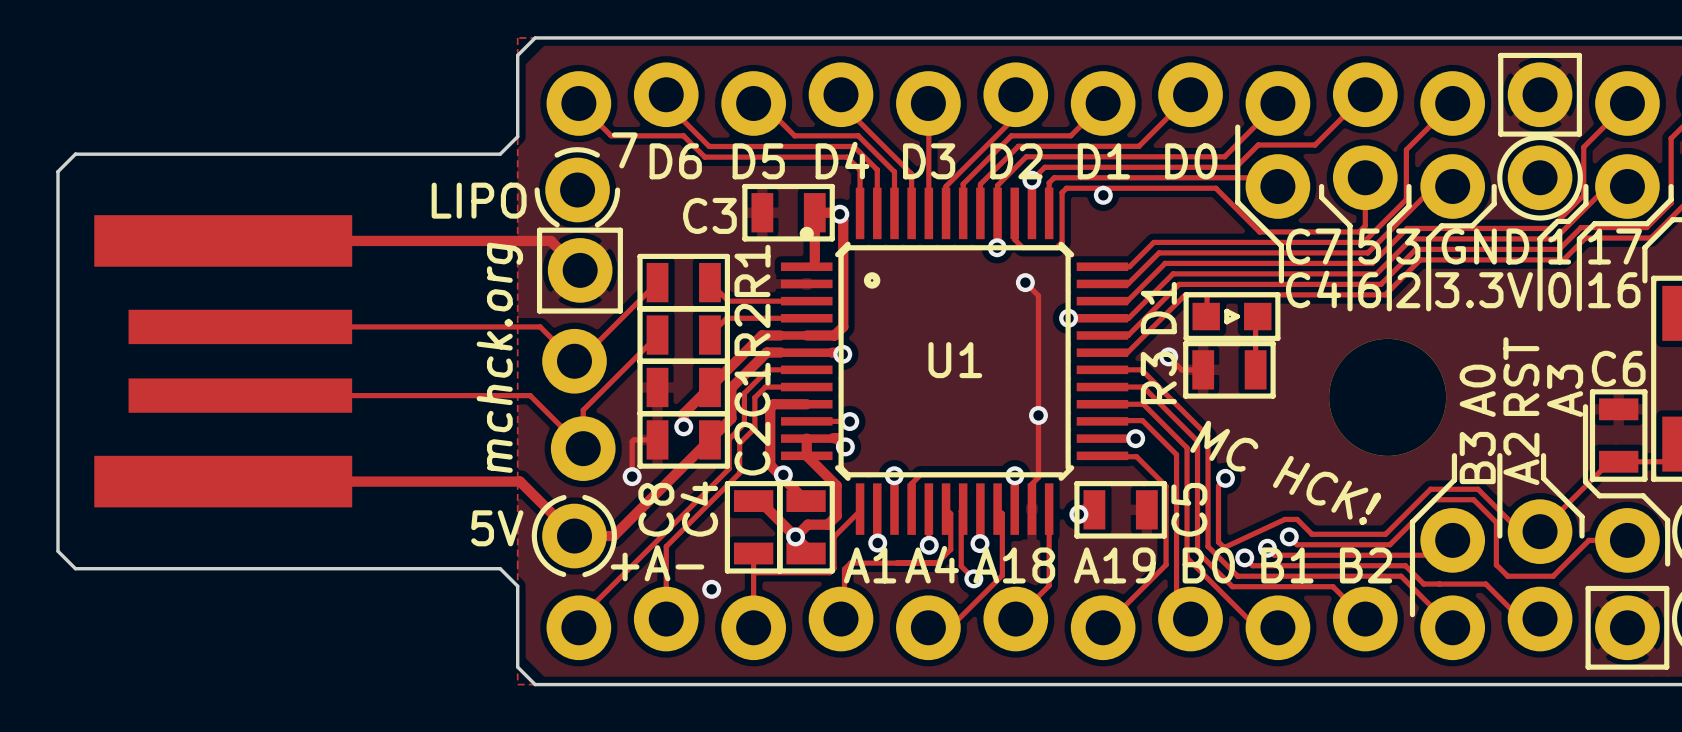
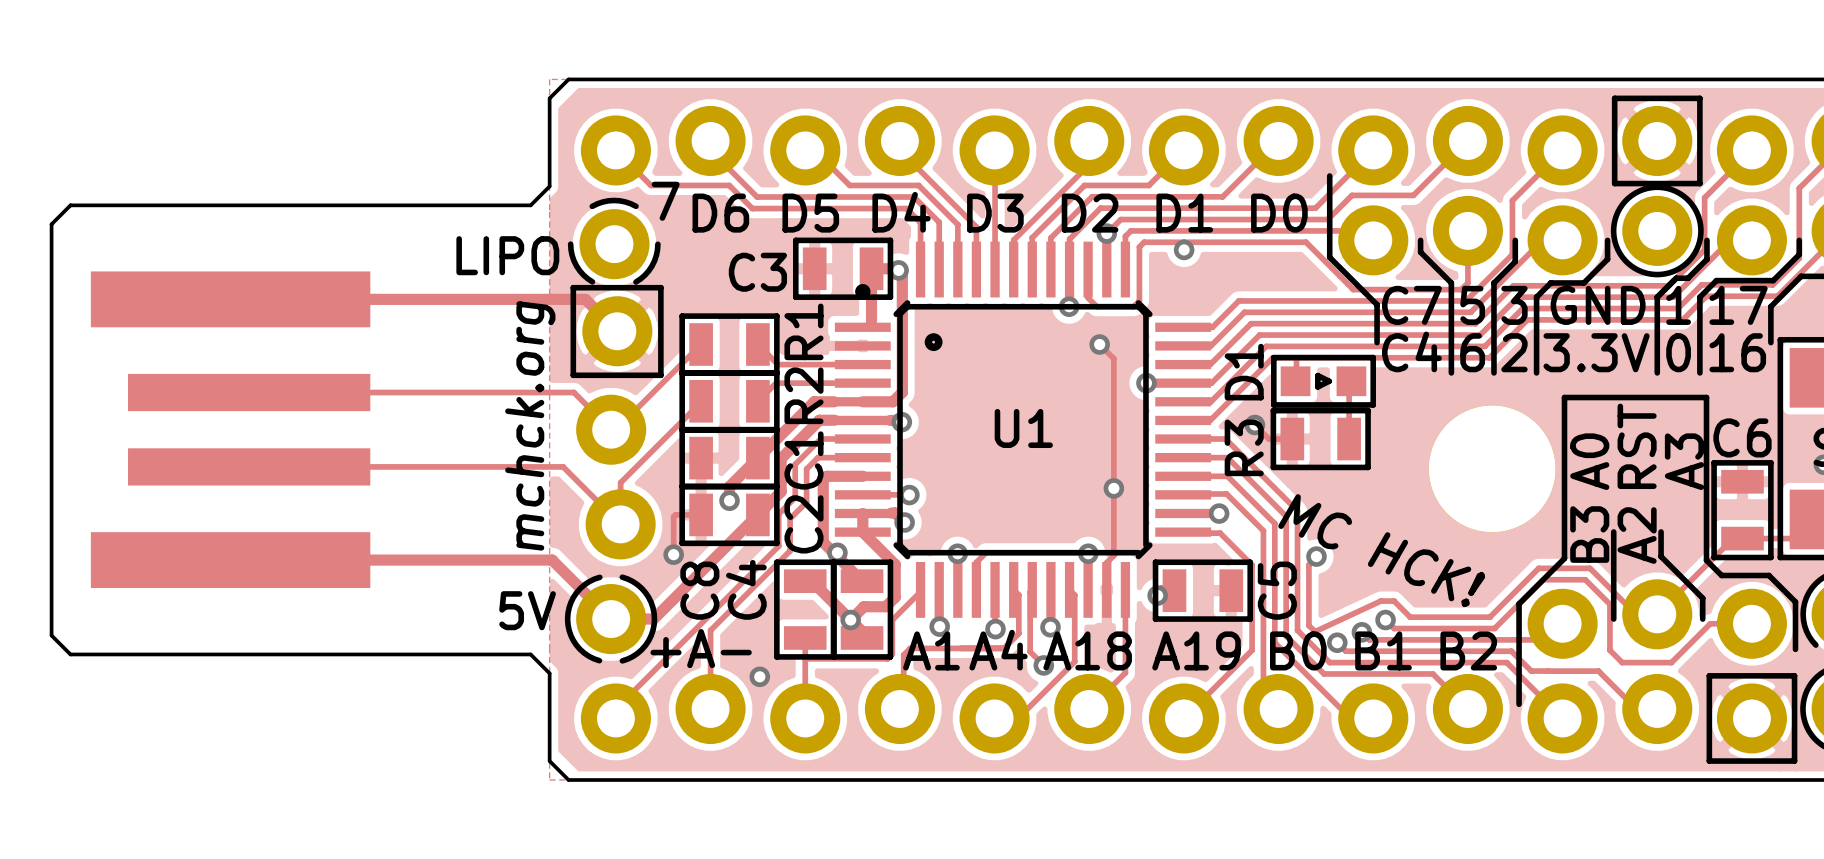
line: none -> (1706, 478) (1706, 397) (1564, 397) (1564, 531)

